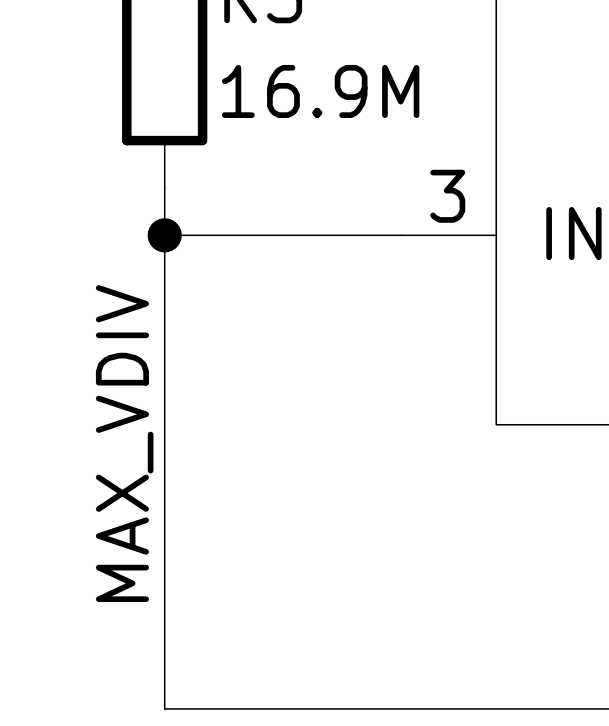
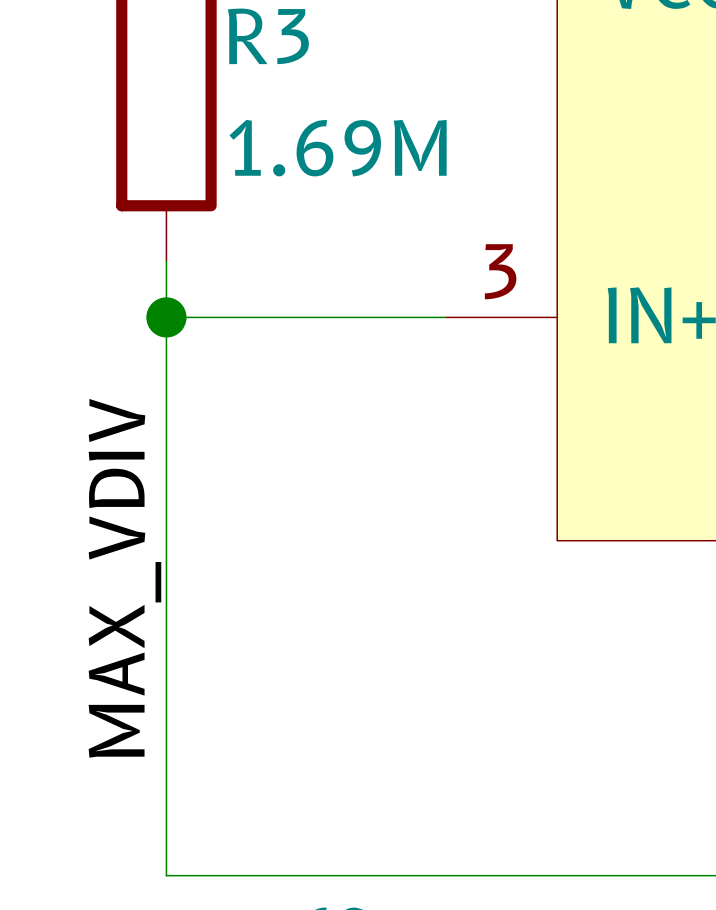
R3 value: 16.9M (320, 91) -> 1.69M (338, 148)

